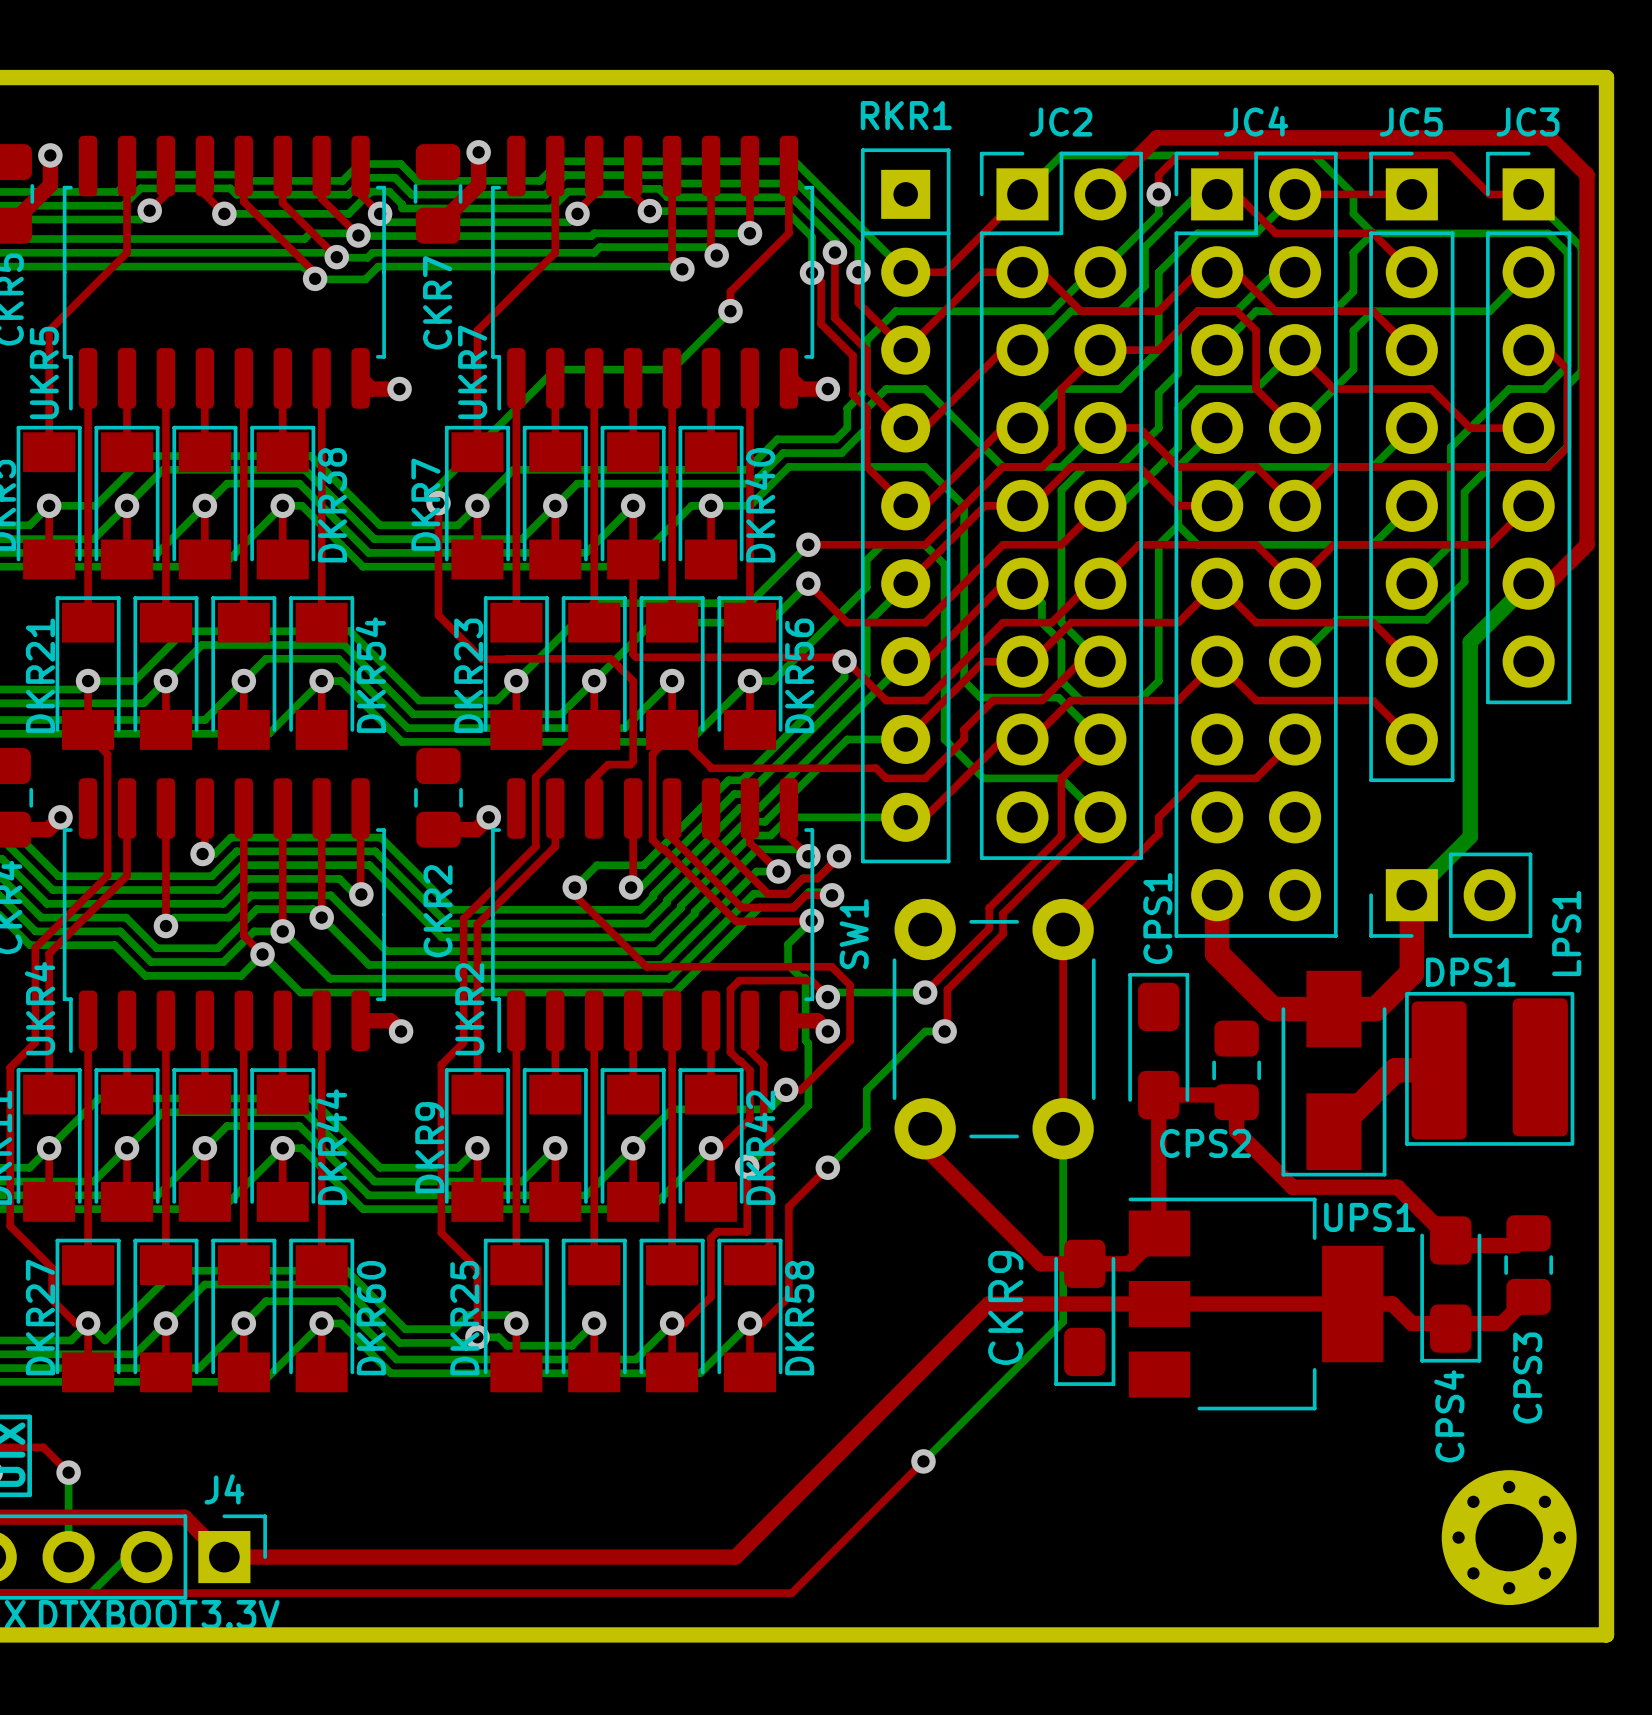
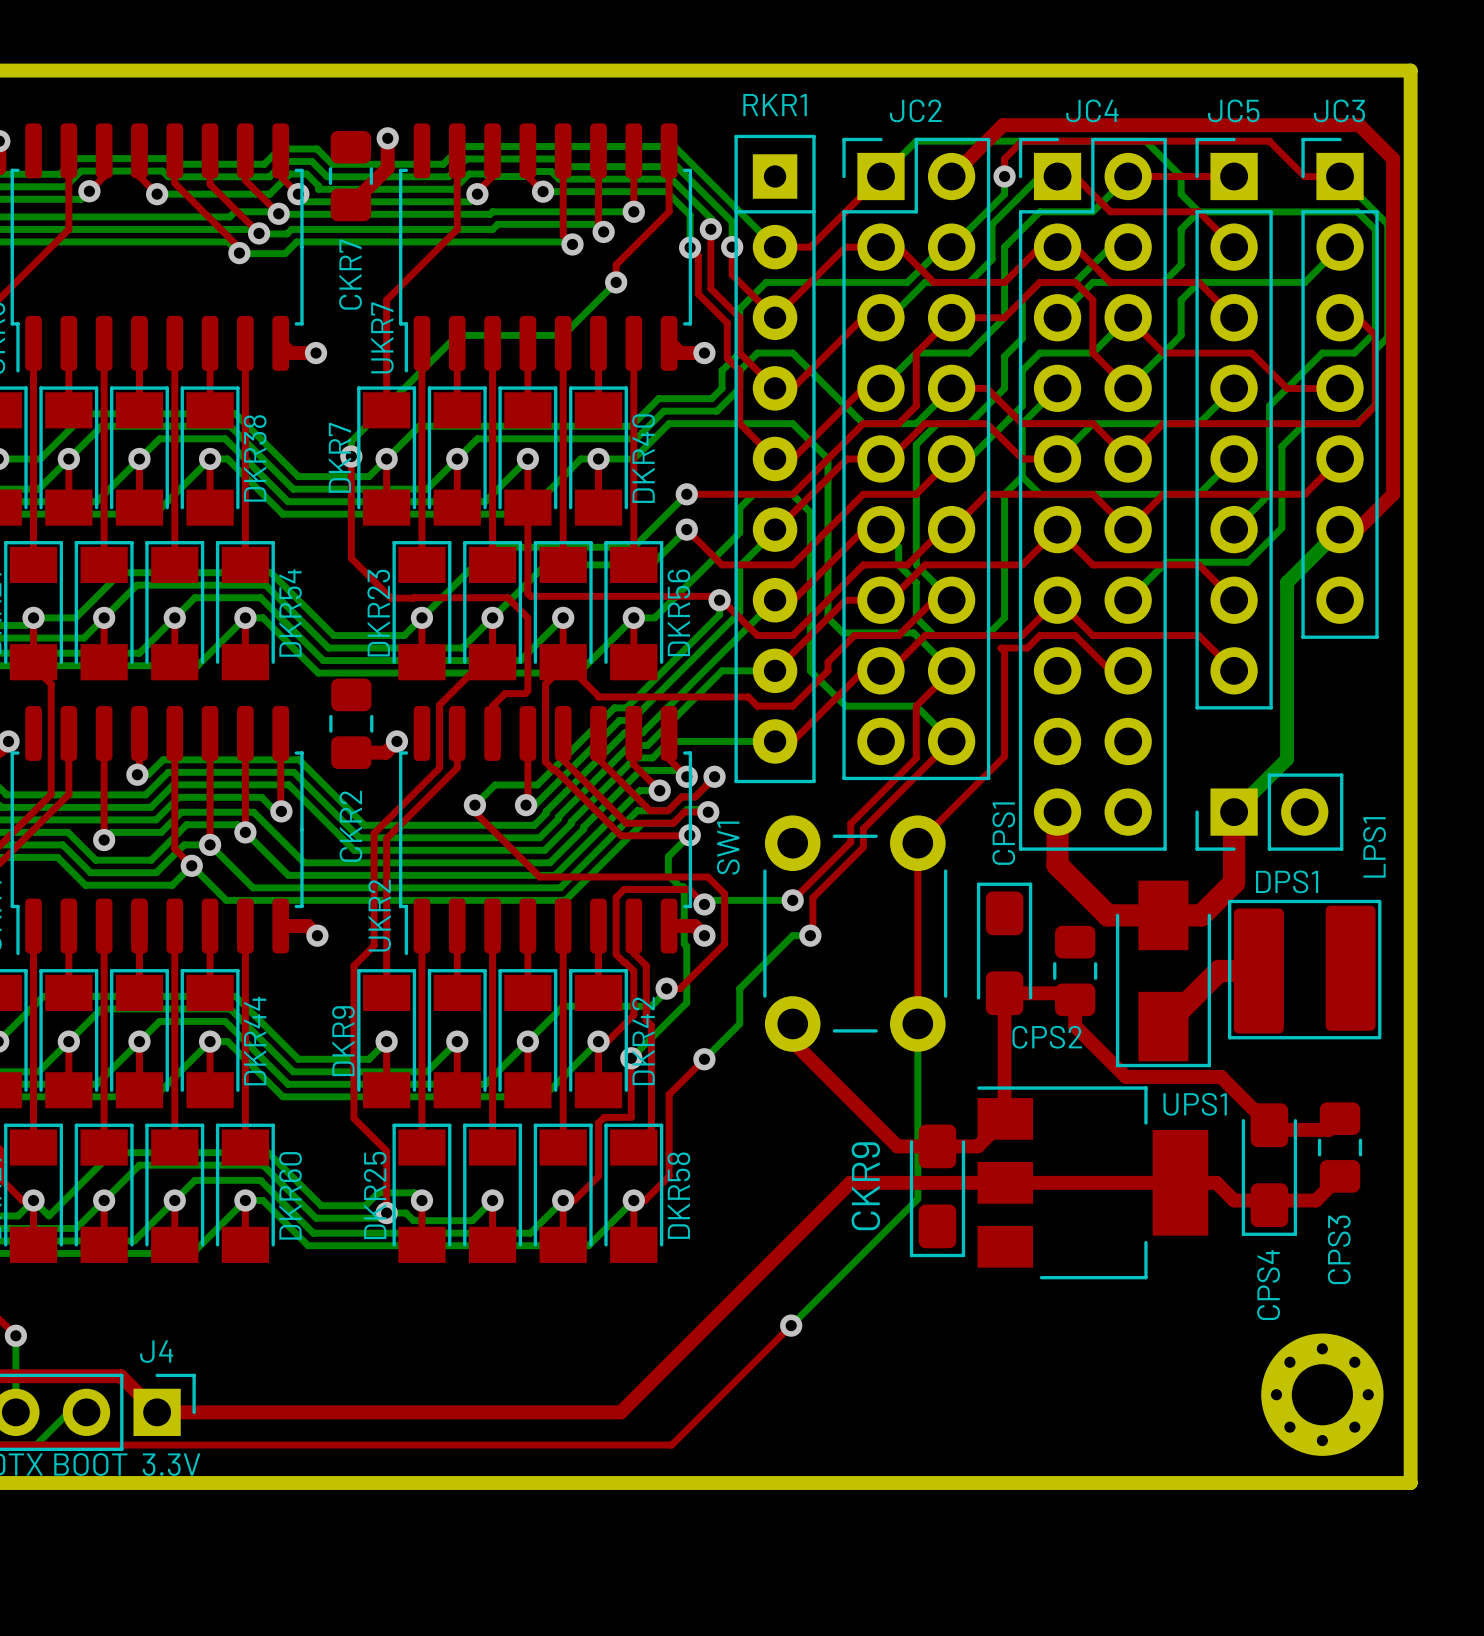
top track: (1295, 739) (1256, 778) (1197, 778) (1158, 817) -> (1128, 670) (1110, 670) (1075, 635) (1039, 635) (1027, 648) (1000, 648) (1004, 651) (1004, 741)

